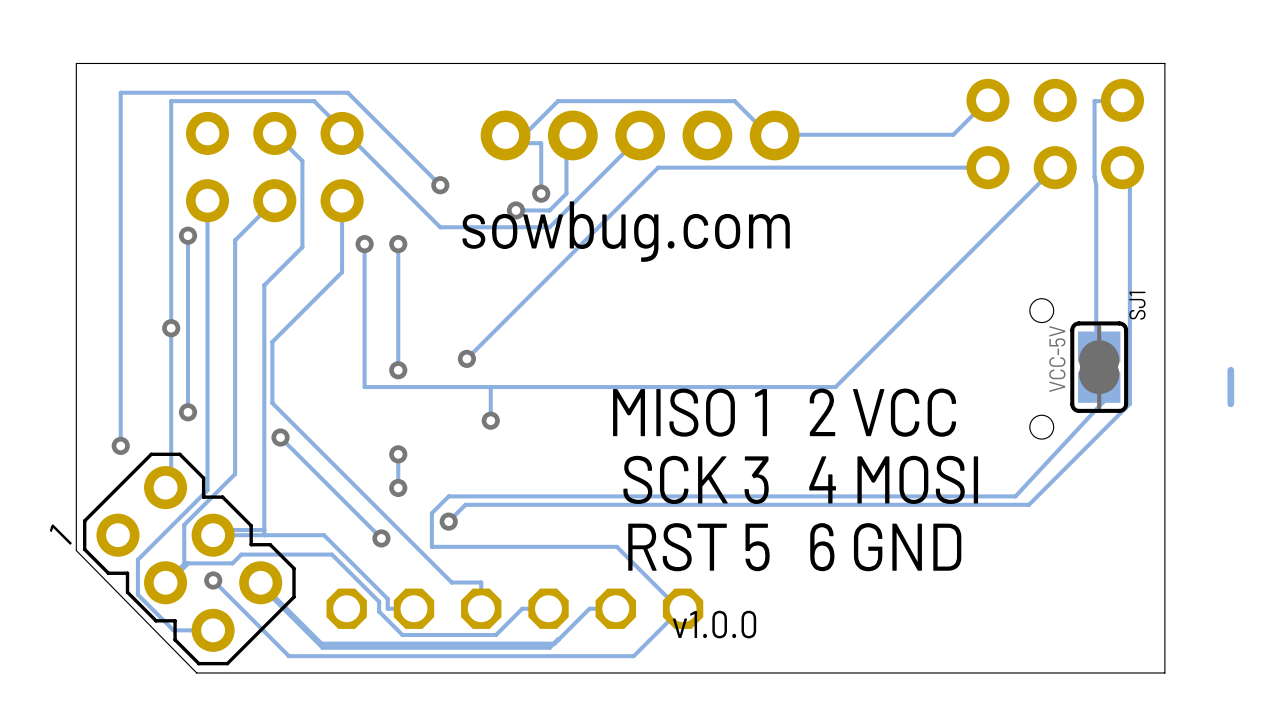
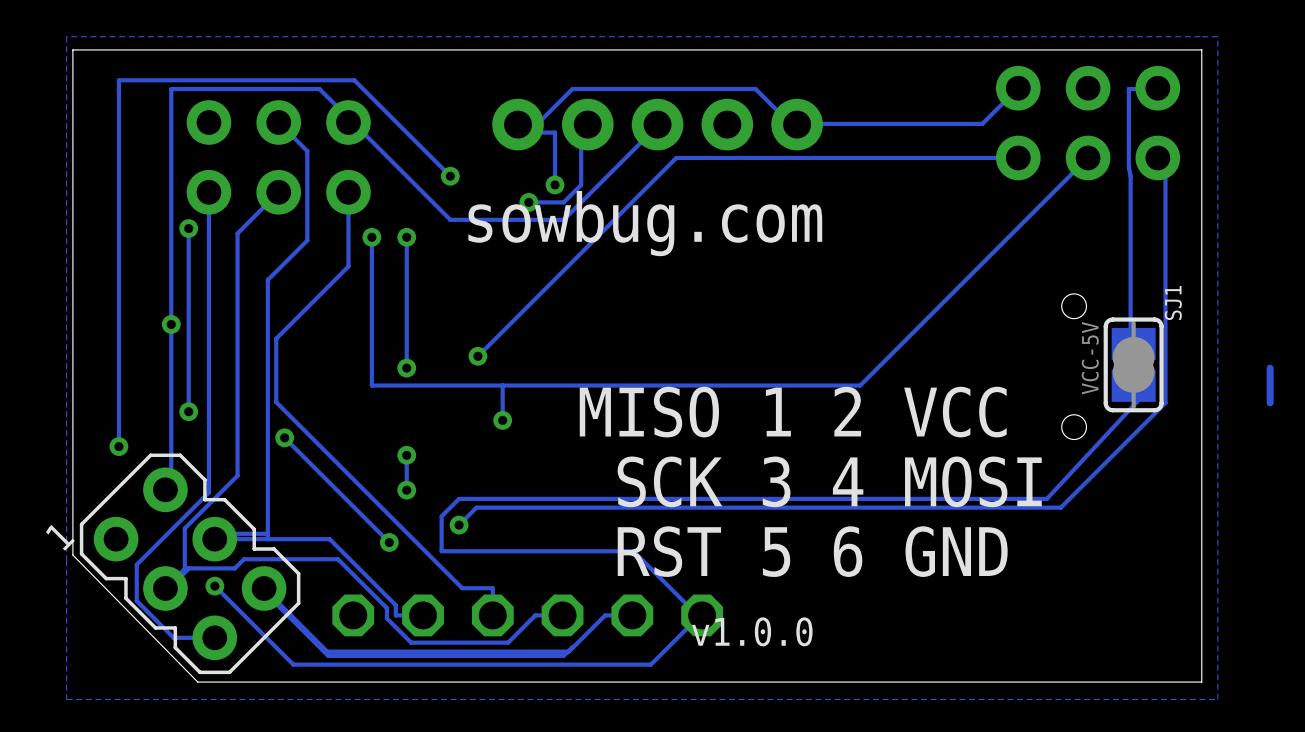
zone outline: none -> (1217, 36) (66, 36) (66, 699) (1217, 699) (1217, 36)

